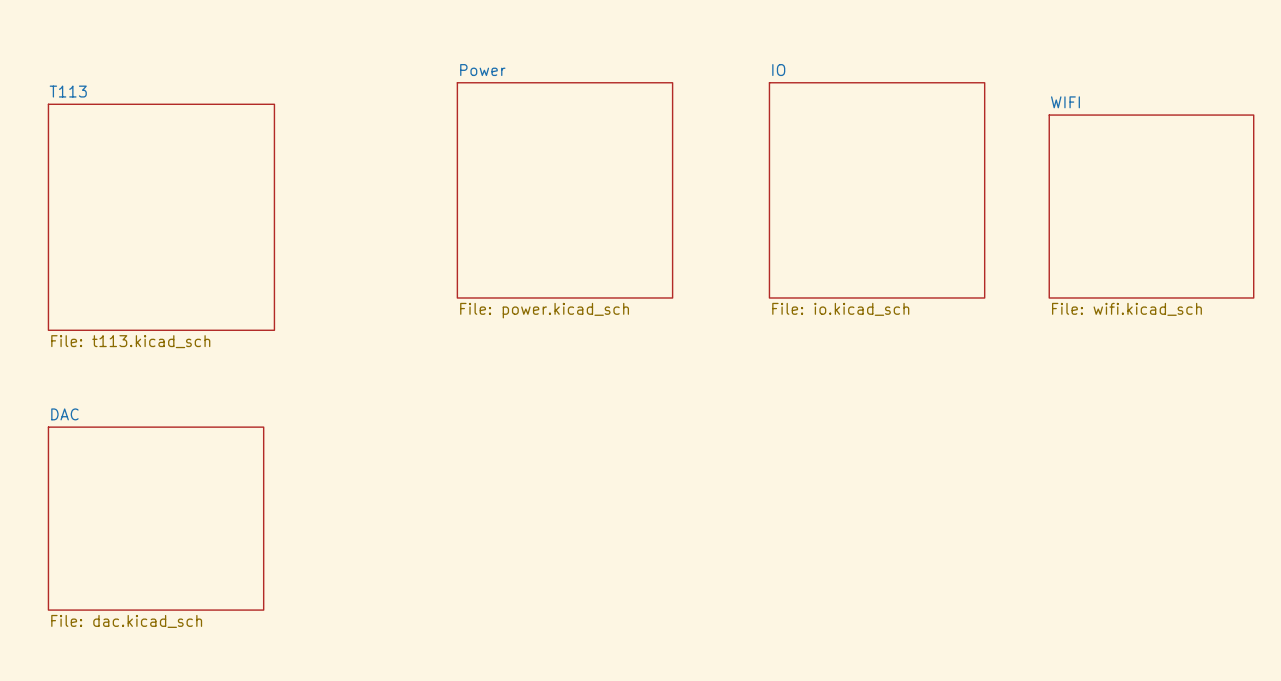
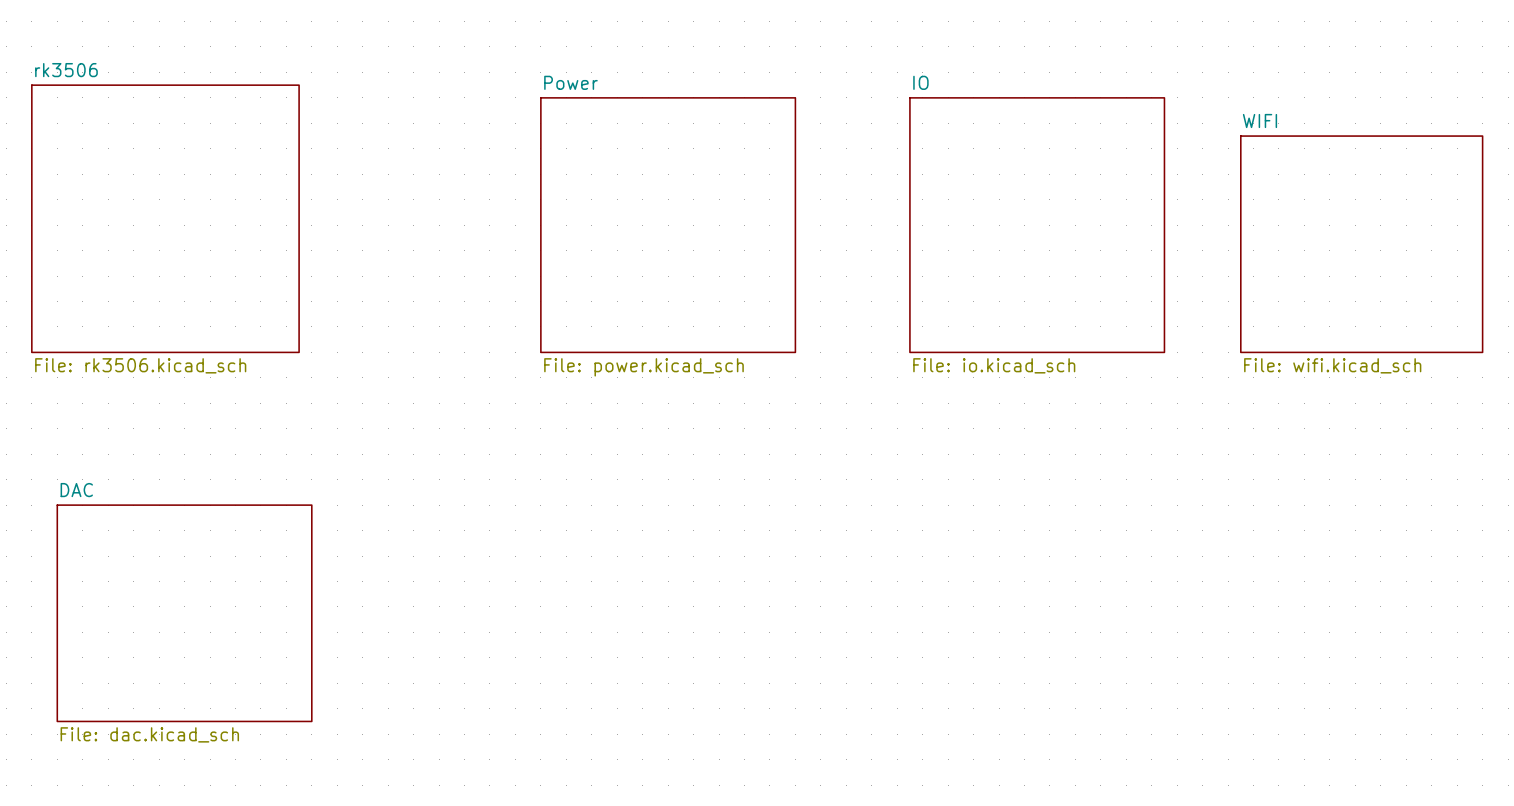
sheet rk3506: none -> File: rk3506.kicad_sch (165, 218)
sheet T113: File: t113.kicad_sch (161, 217) -> none

